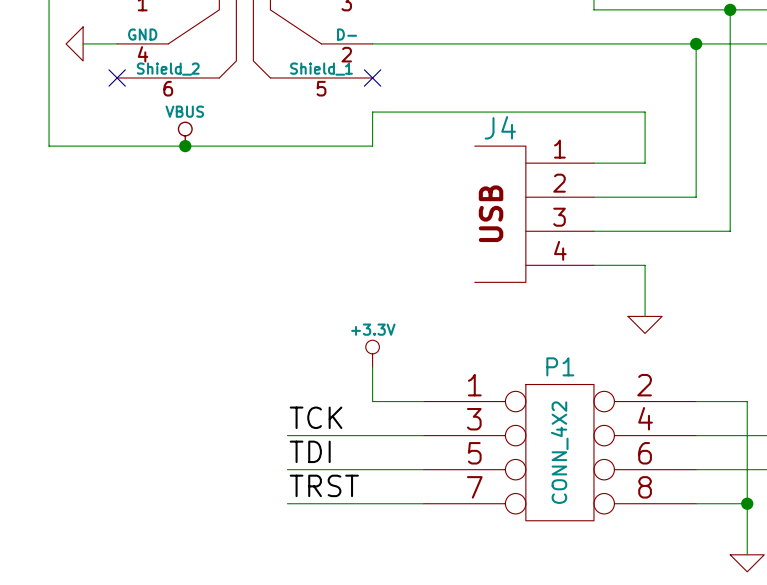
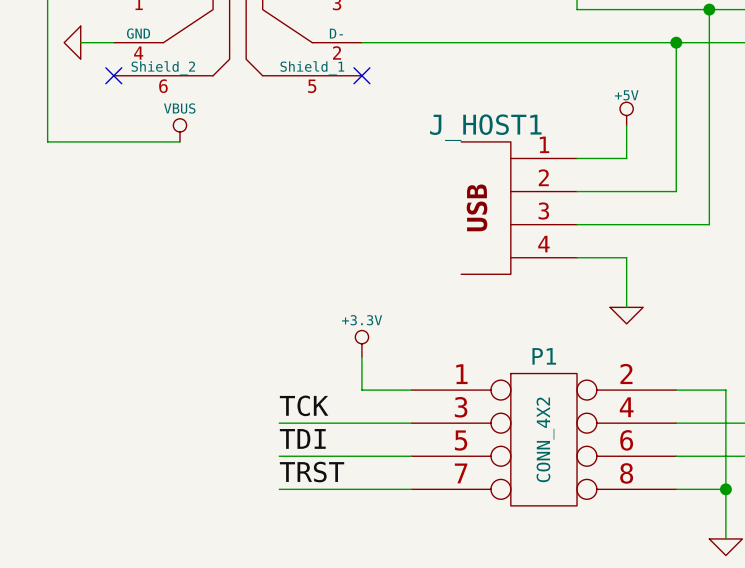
power symbol: none -> +5V (626, 113)
J4 name: J4 (500, 127) -> J_HOST1 (485, 127)
wire: (645, 129) (645, 112) (372, 112) (372, 146) (185, 146) -> none
junction: (185, 146) -> none

